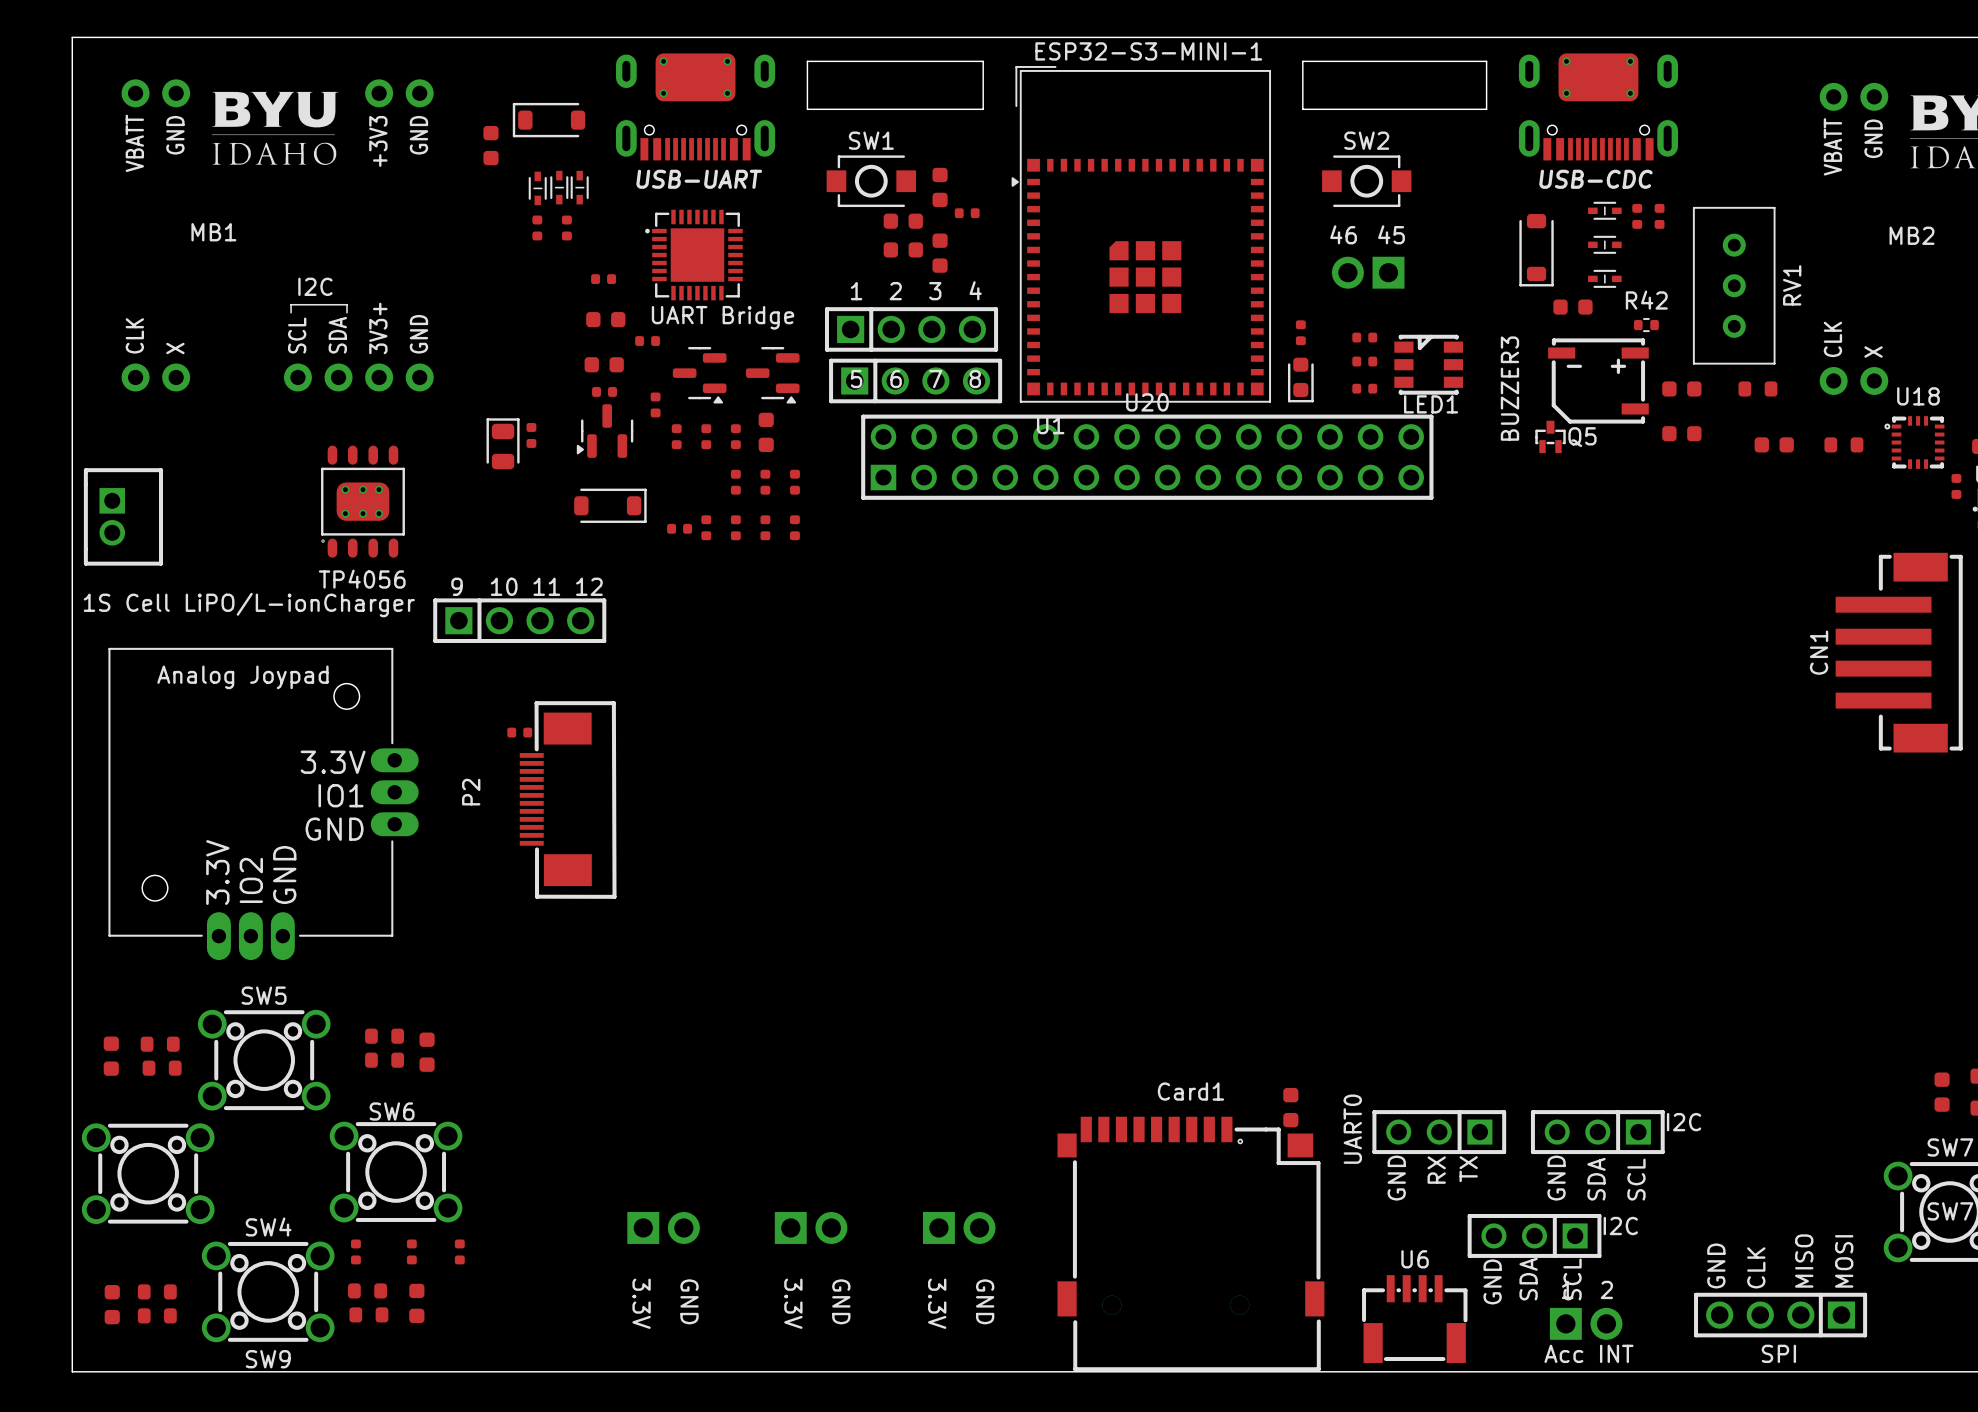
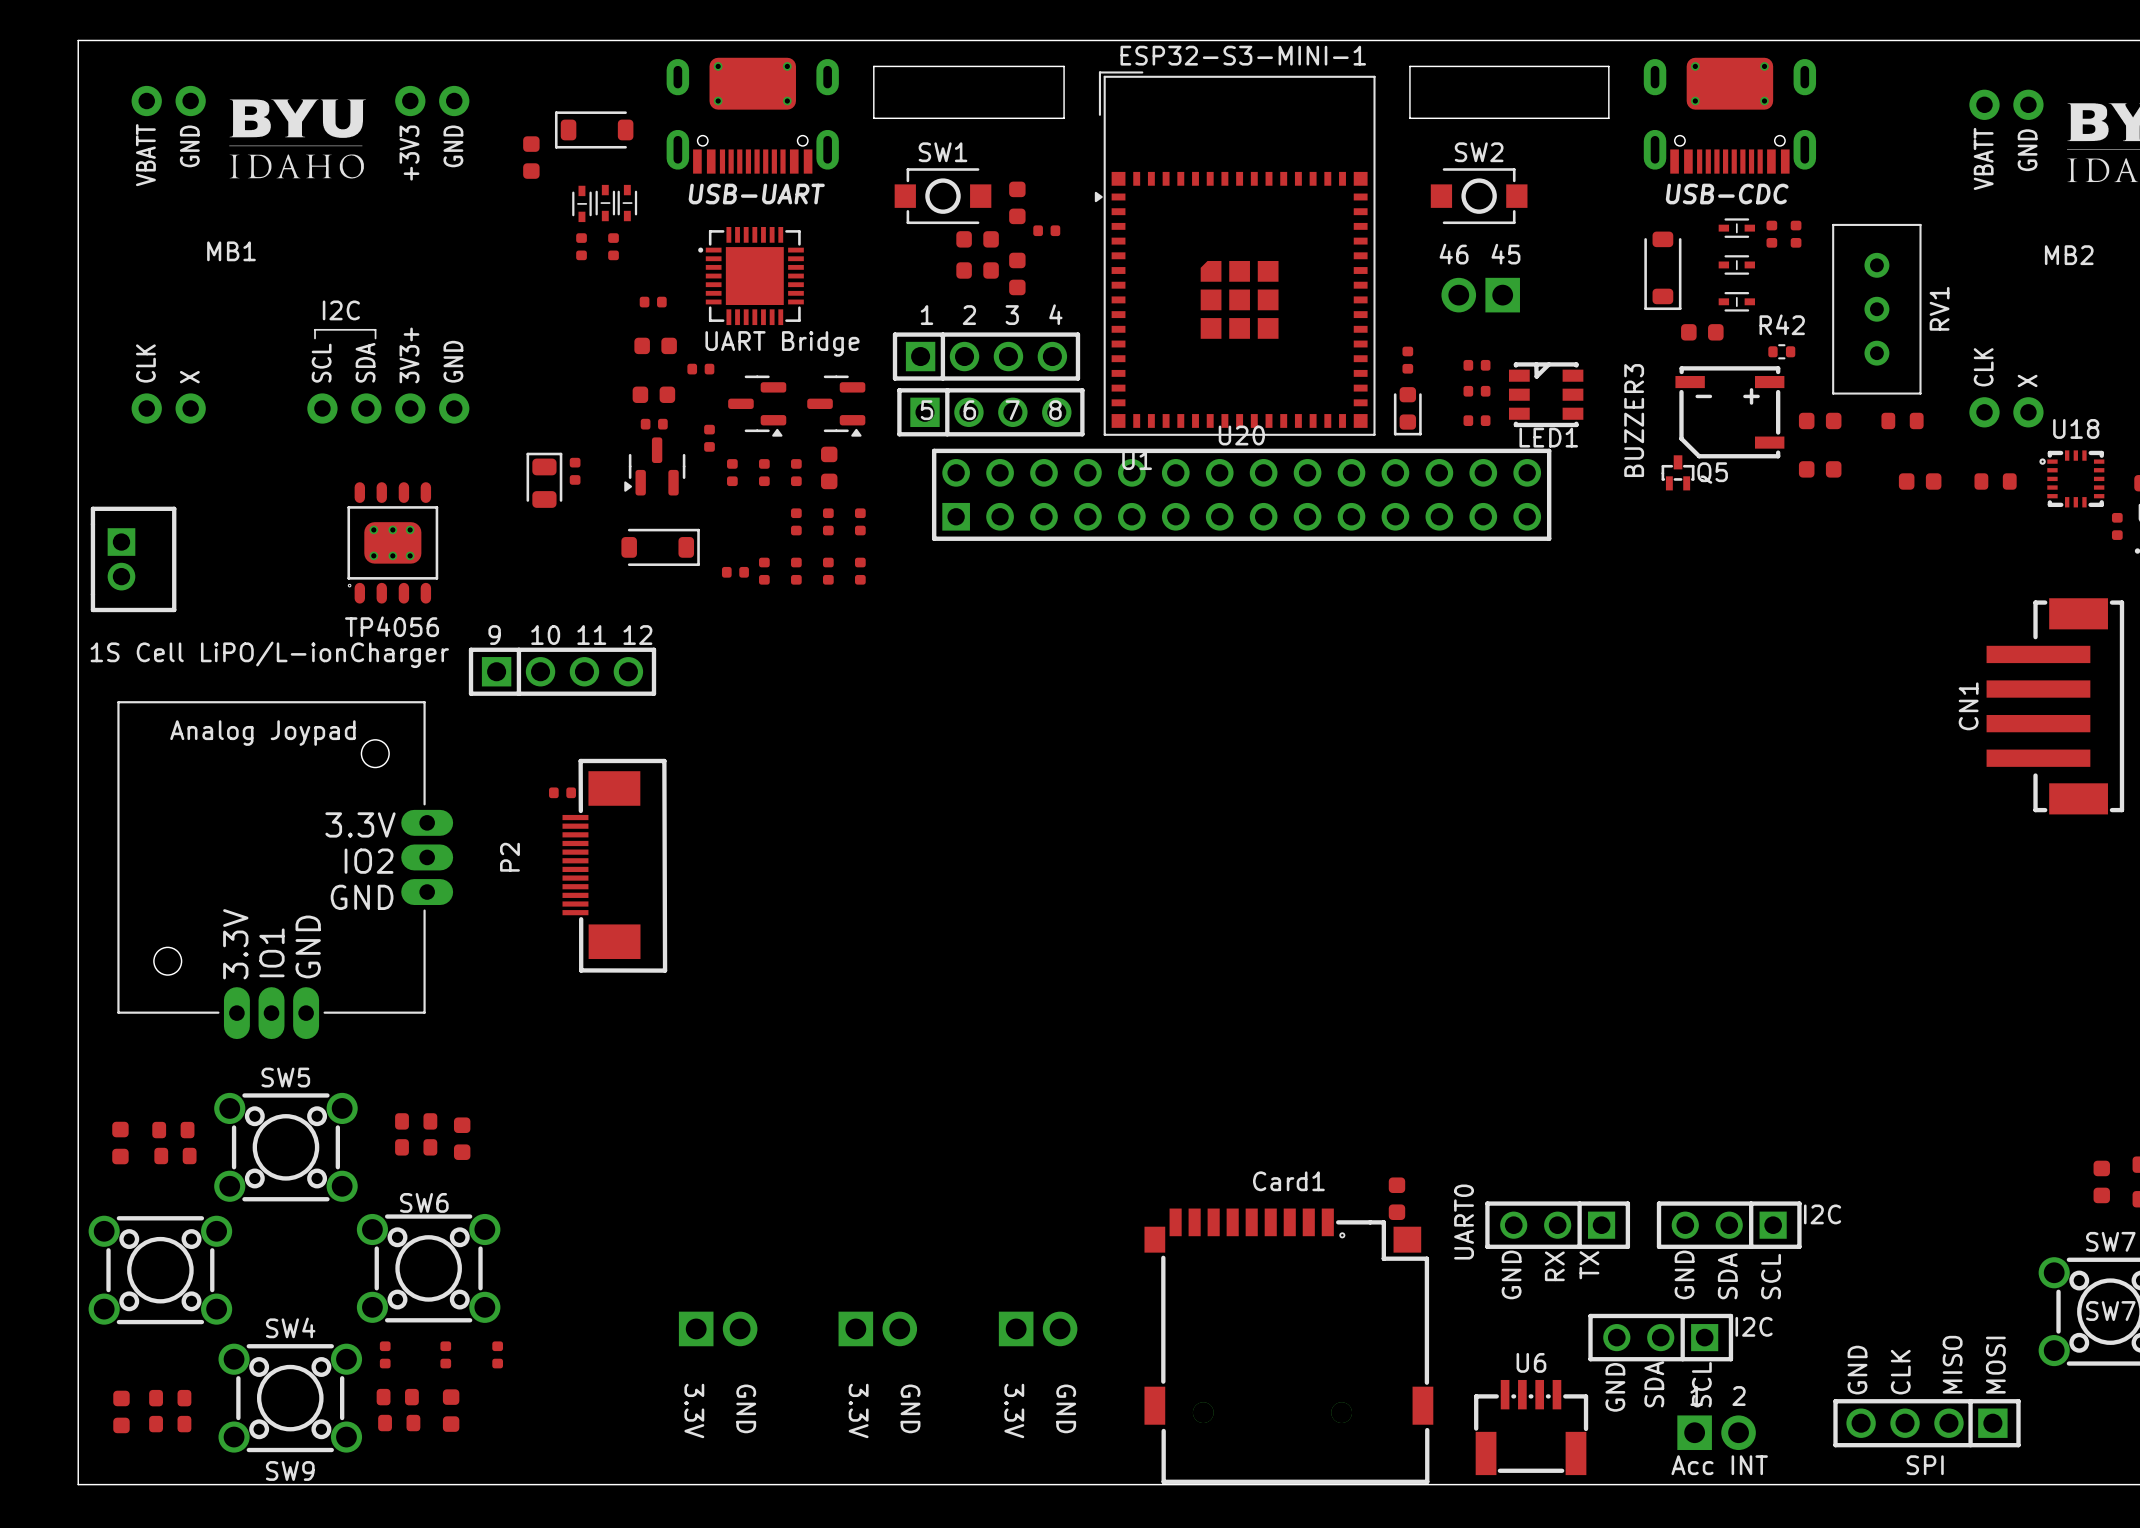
text: IO1 (341, 795) -> IO2 (369, 861)
text: IO2 (251, 880) -> IO1 (271, 952)

